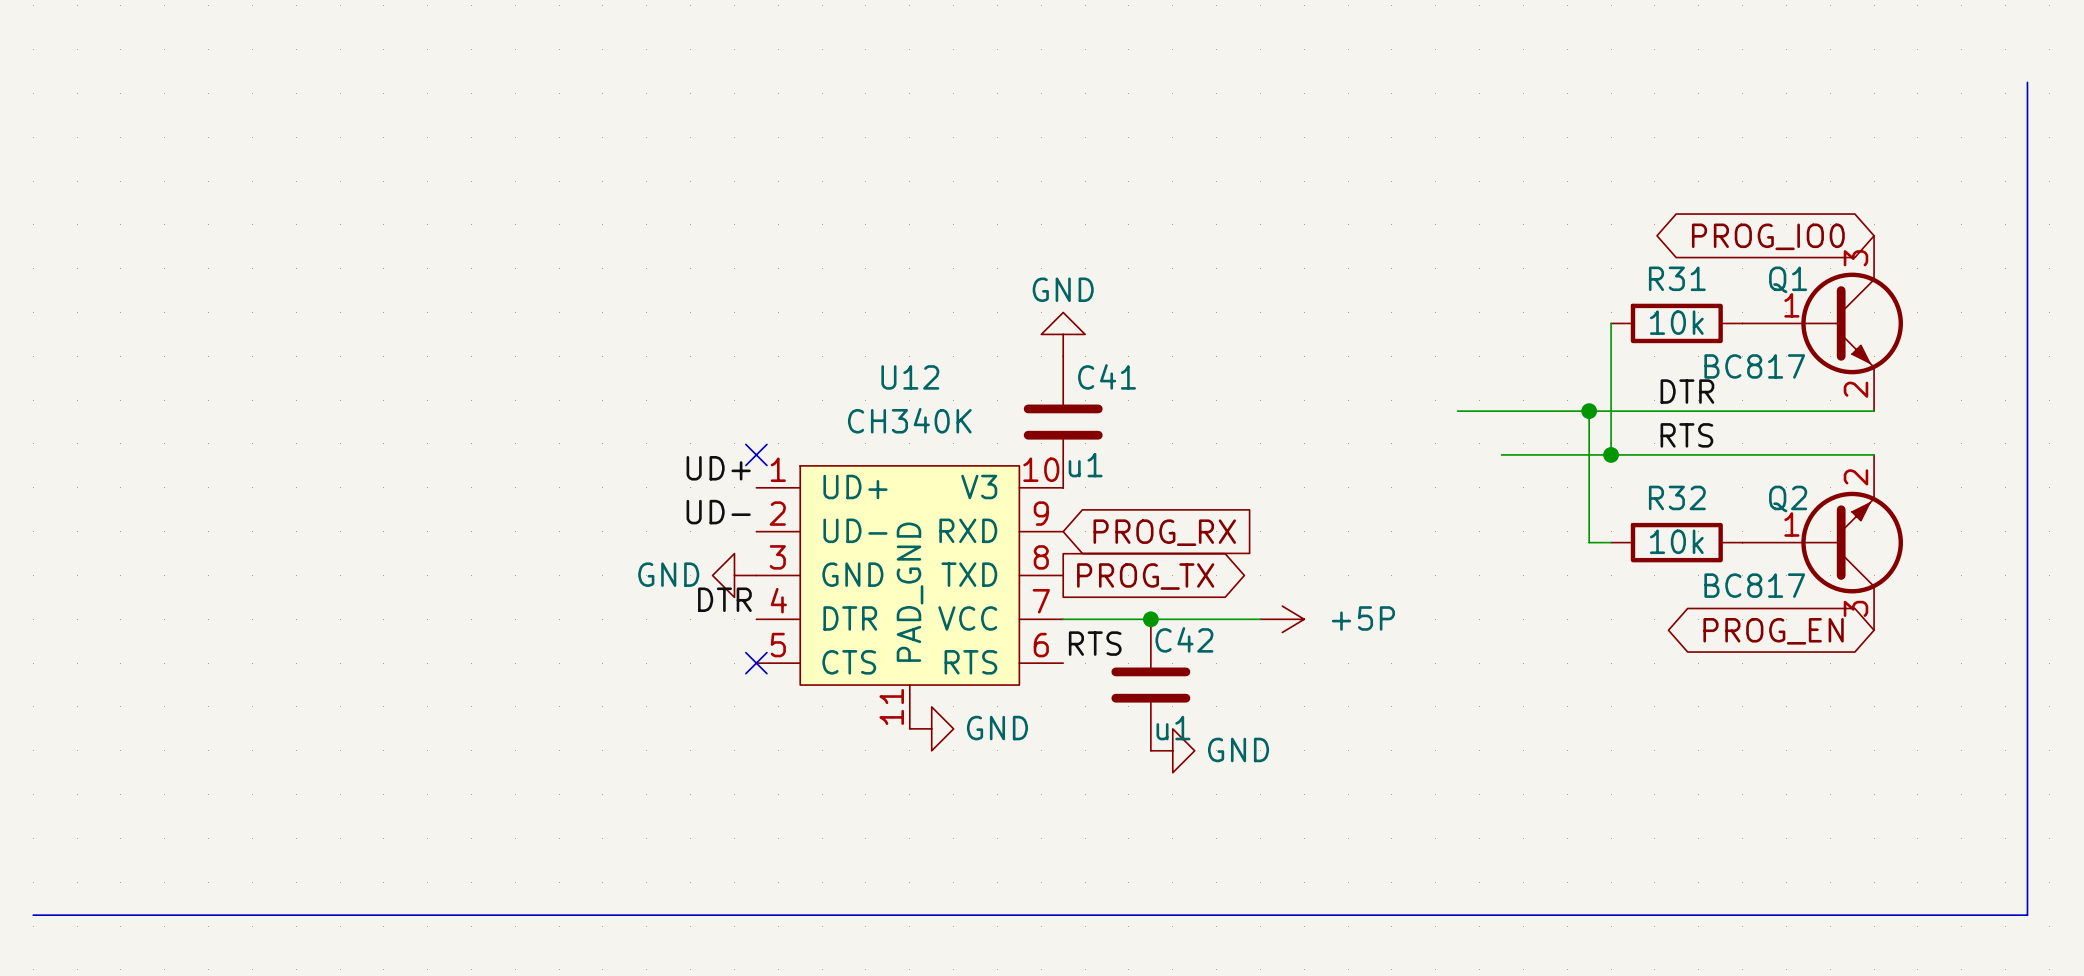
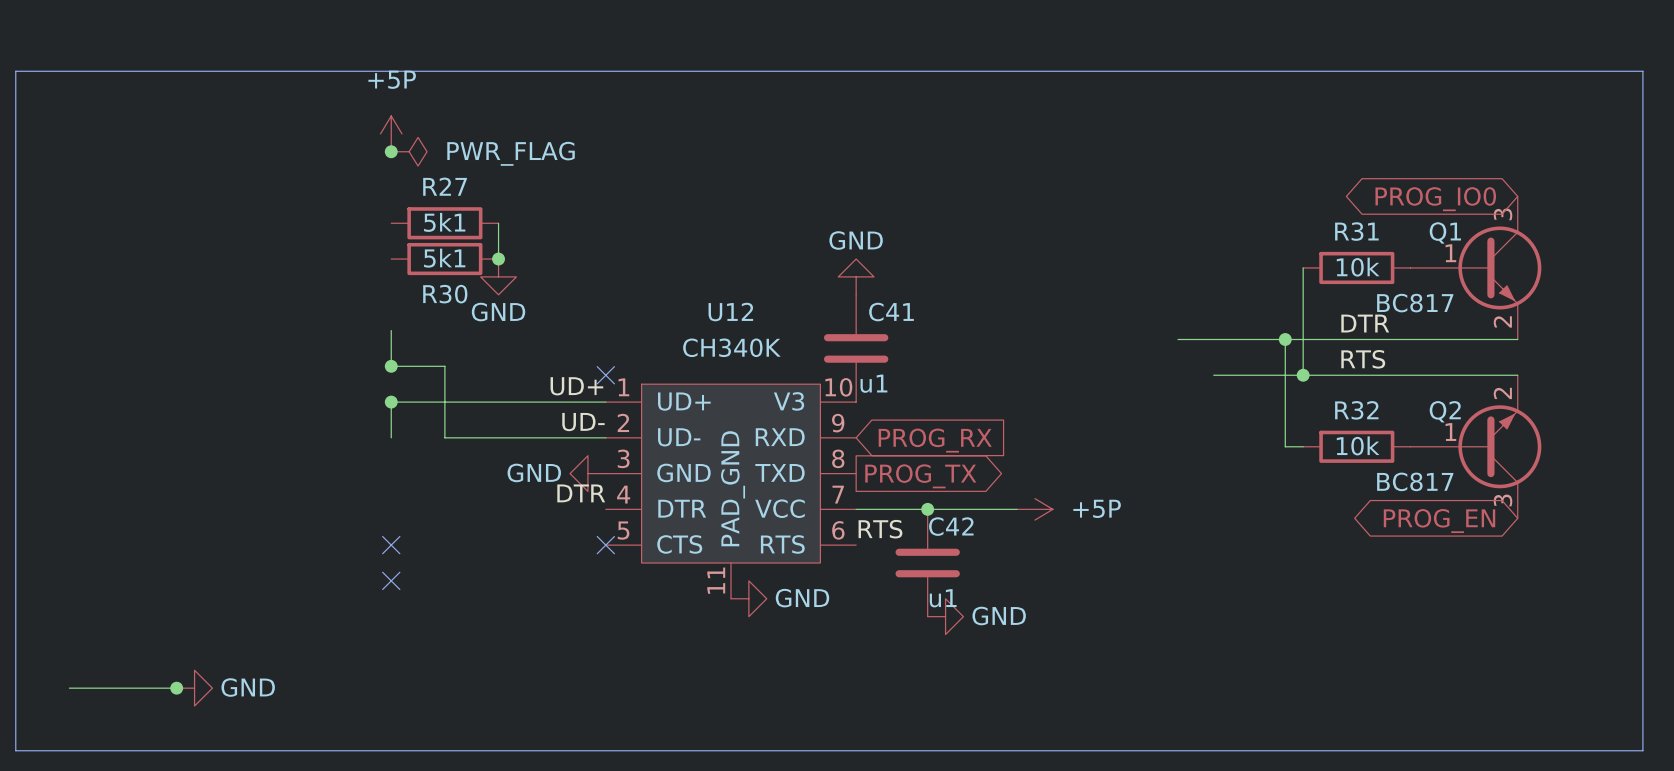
line: none -> (1642, 71) (15, 71) (15, 750)
power symbol: none -> +5P (391, 133)
junction: none -> (391, 151)
power symbol: none -> PWR_FLAG (409, 151)
R27: none -> 5k1 (444, 223)
wire: none -> (498, 223) (498, 259)
R30: none -> 5k1 (444, 259)
junction: none -> (498, 259)
power symbol: none -> GND (498, 276)
wire: none -> (391, 330) (391, 366) (444, 366) (444, 437) (605, 437)
junction: none -> (391, 366)
junction: none -> (391, 402)
wire: none -> (605, 402) (391, 402) (391, 437)
no-connect mark: none -> (391, 545)
no-connect mark: none -> (391, 580)
wire: none -> (69, 688) (176, 688)
junction: none -> (176, 688)
power symbol: none -> GND (194, 688)

